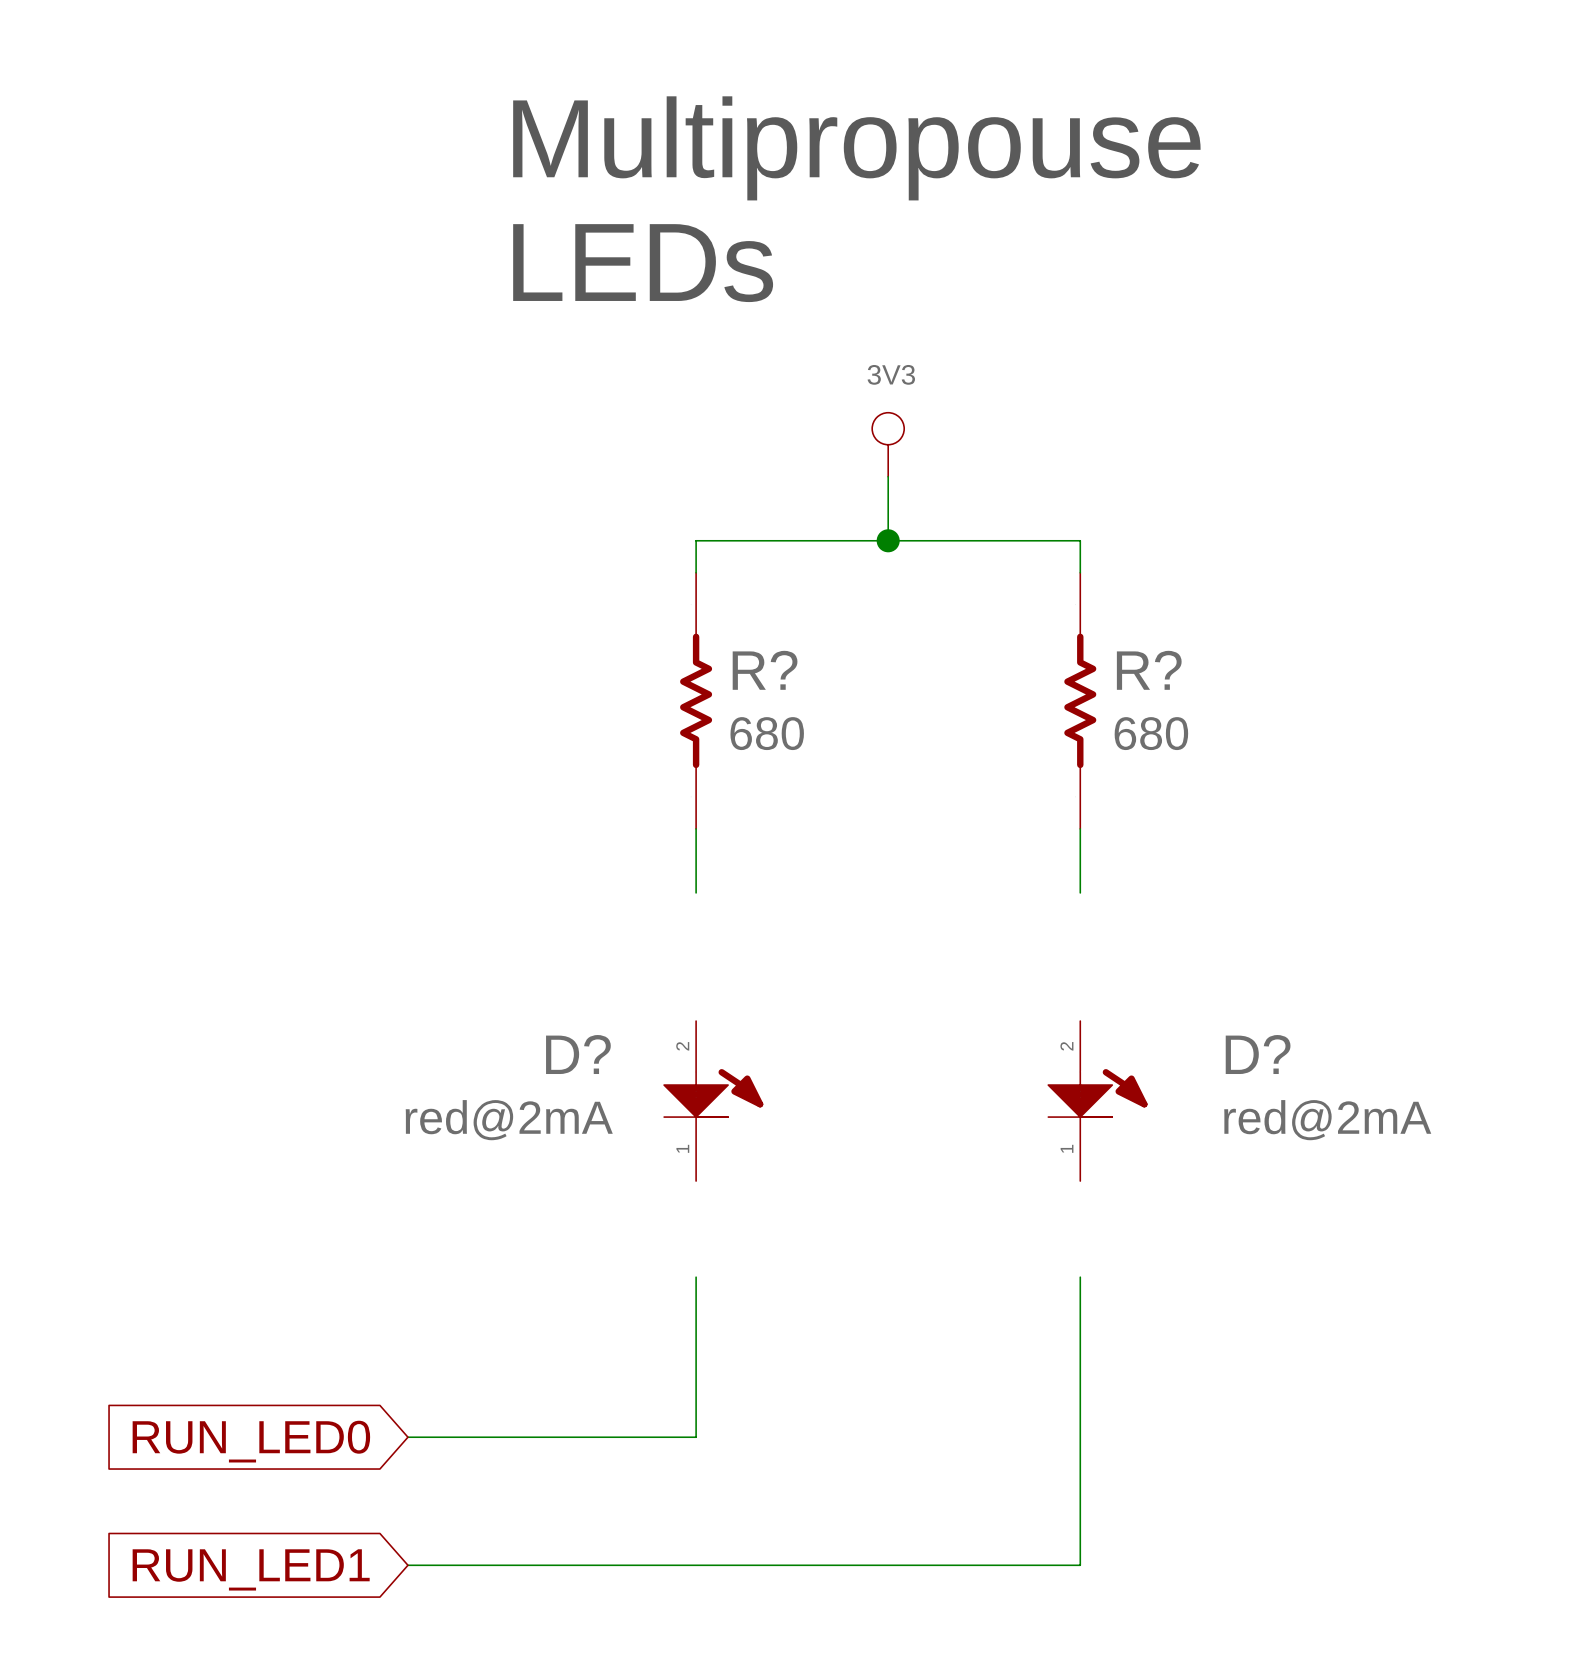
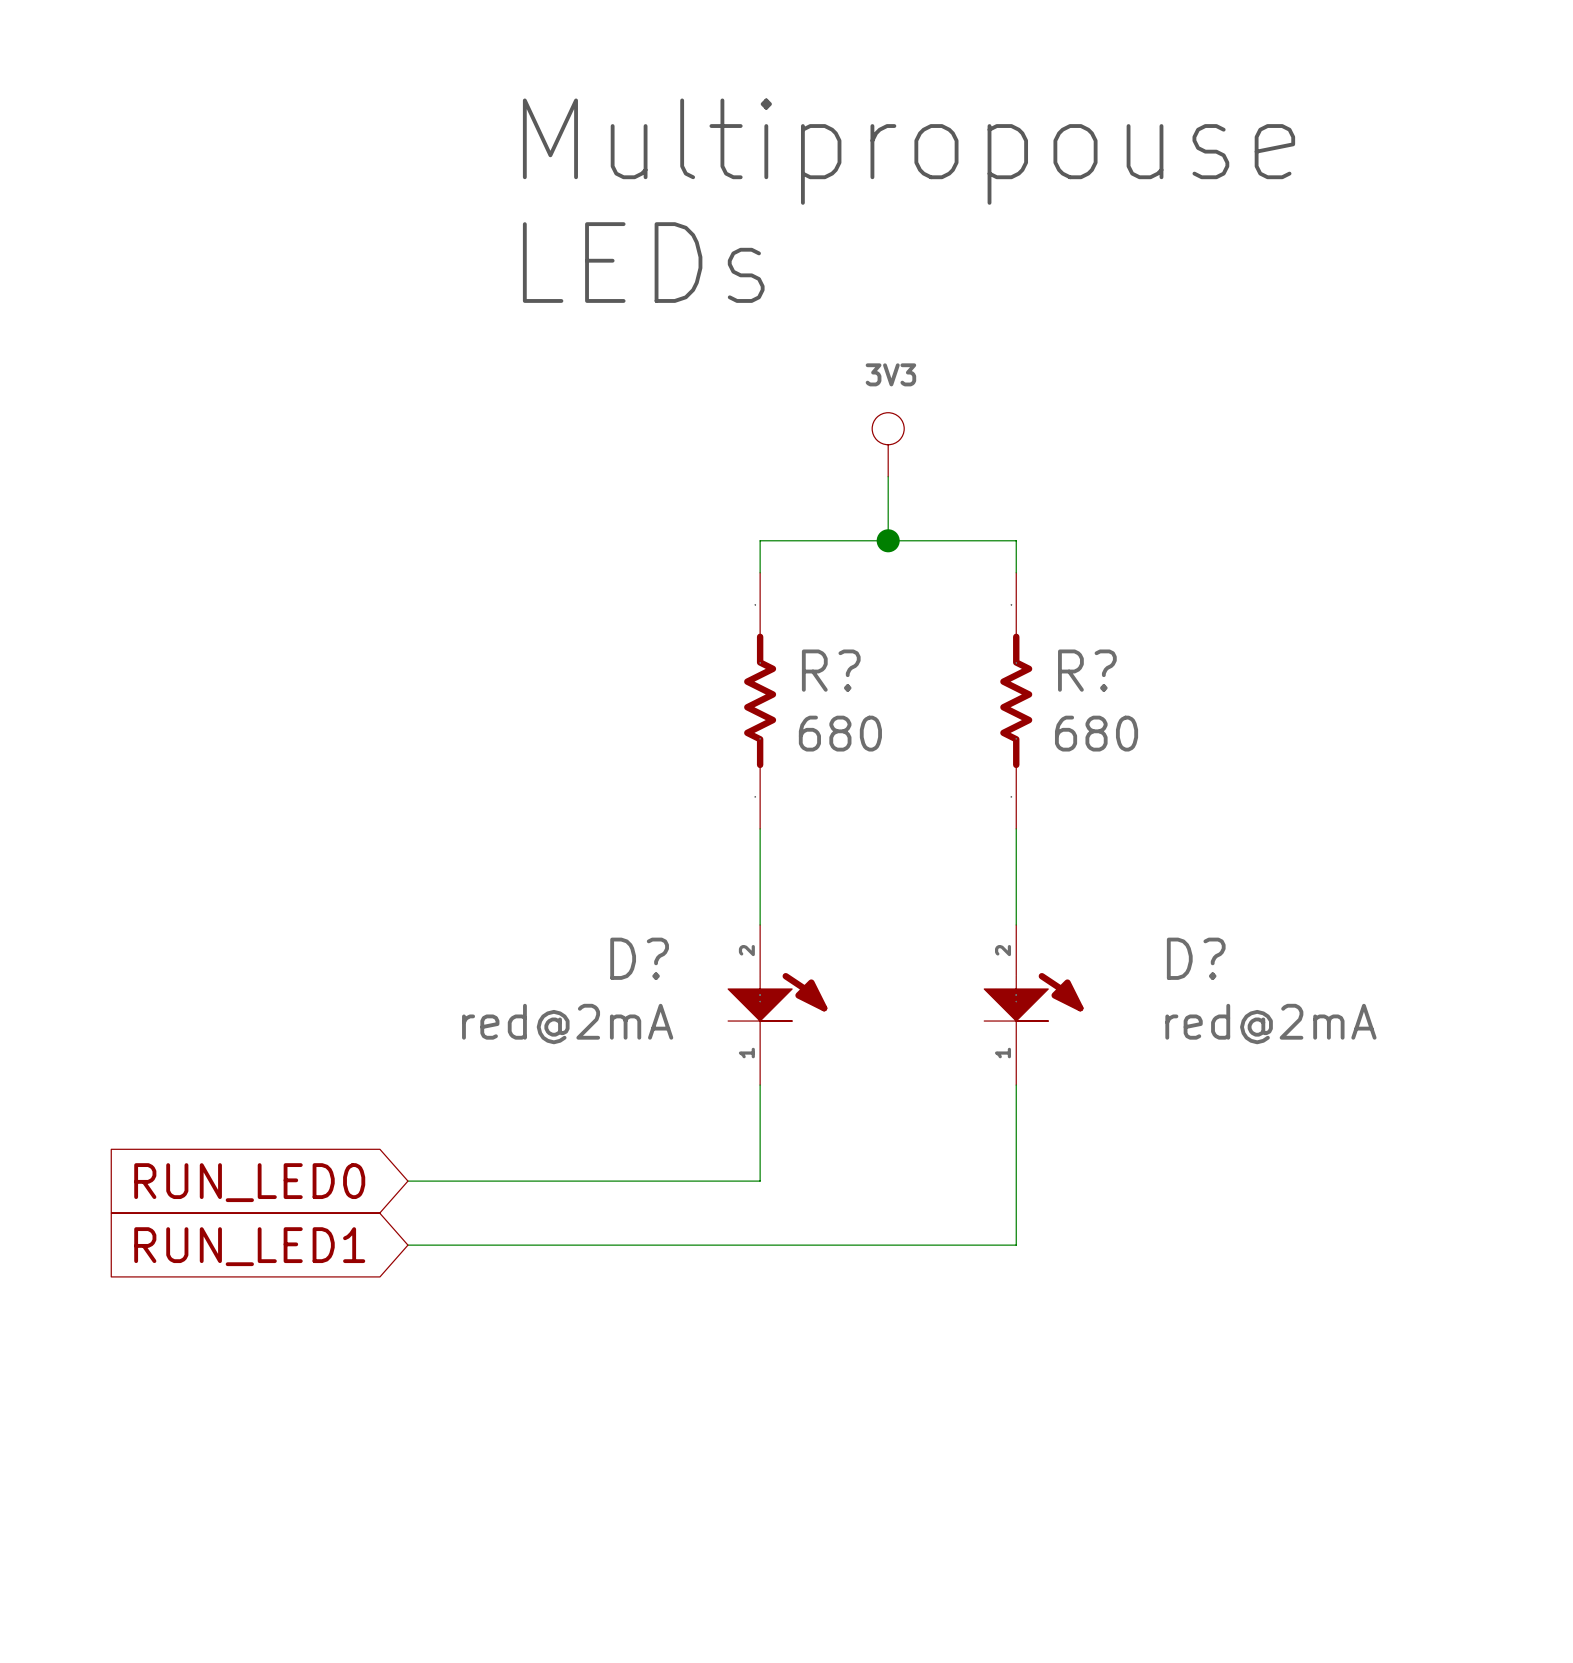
wire: (760, 540) (696, 540) (696, 572) -> (760, 540) (760, 572)
wire: (1016, 540) (1080, 540) (1080, 572) -> (1016, 540) (1016, 572)
R? position: (696, 700) -> (760, 700)
R? position: (1080, 700) -> (1016, 700)
wire: (696, 828) (696, 892) -> none
wire: none -> (760, 828) (760, 924)
wire: none -> (1016, 828) (1016, 924)
wire: (1080, 828) (1080, 892) -> none
wire: none -> (760, 1085) (760, 1181) (407, 1181)
wire: none -> (1016, 1085) (1016, 1245) (407, 1245)
D? position: (713, 1101) -> (777, 1005)
D? position: (1097, 1101) -> (1033, 1005)
wire: (696, 1277) (696, 1437) (407, 1437) -> none
wire: (1080, 1277) (1080, 1565) (407, 1565) -> none
global label position: RUN_LED0 (251, 1441) -> RUN_LED0 (249, 1182)
global label position: RUN_LED1 (251, 1569) -> RUN_LED1 (249, 1246)

